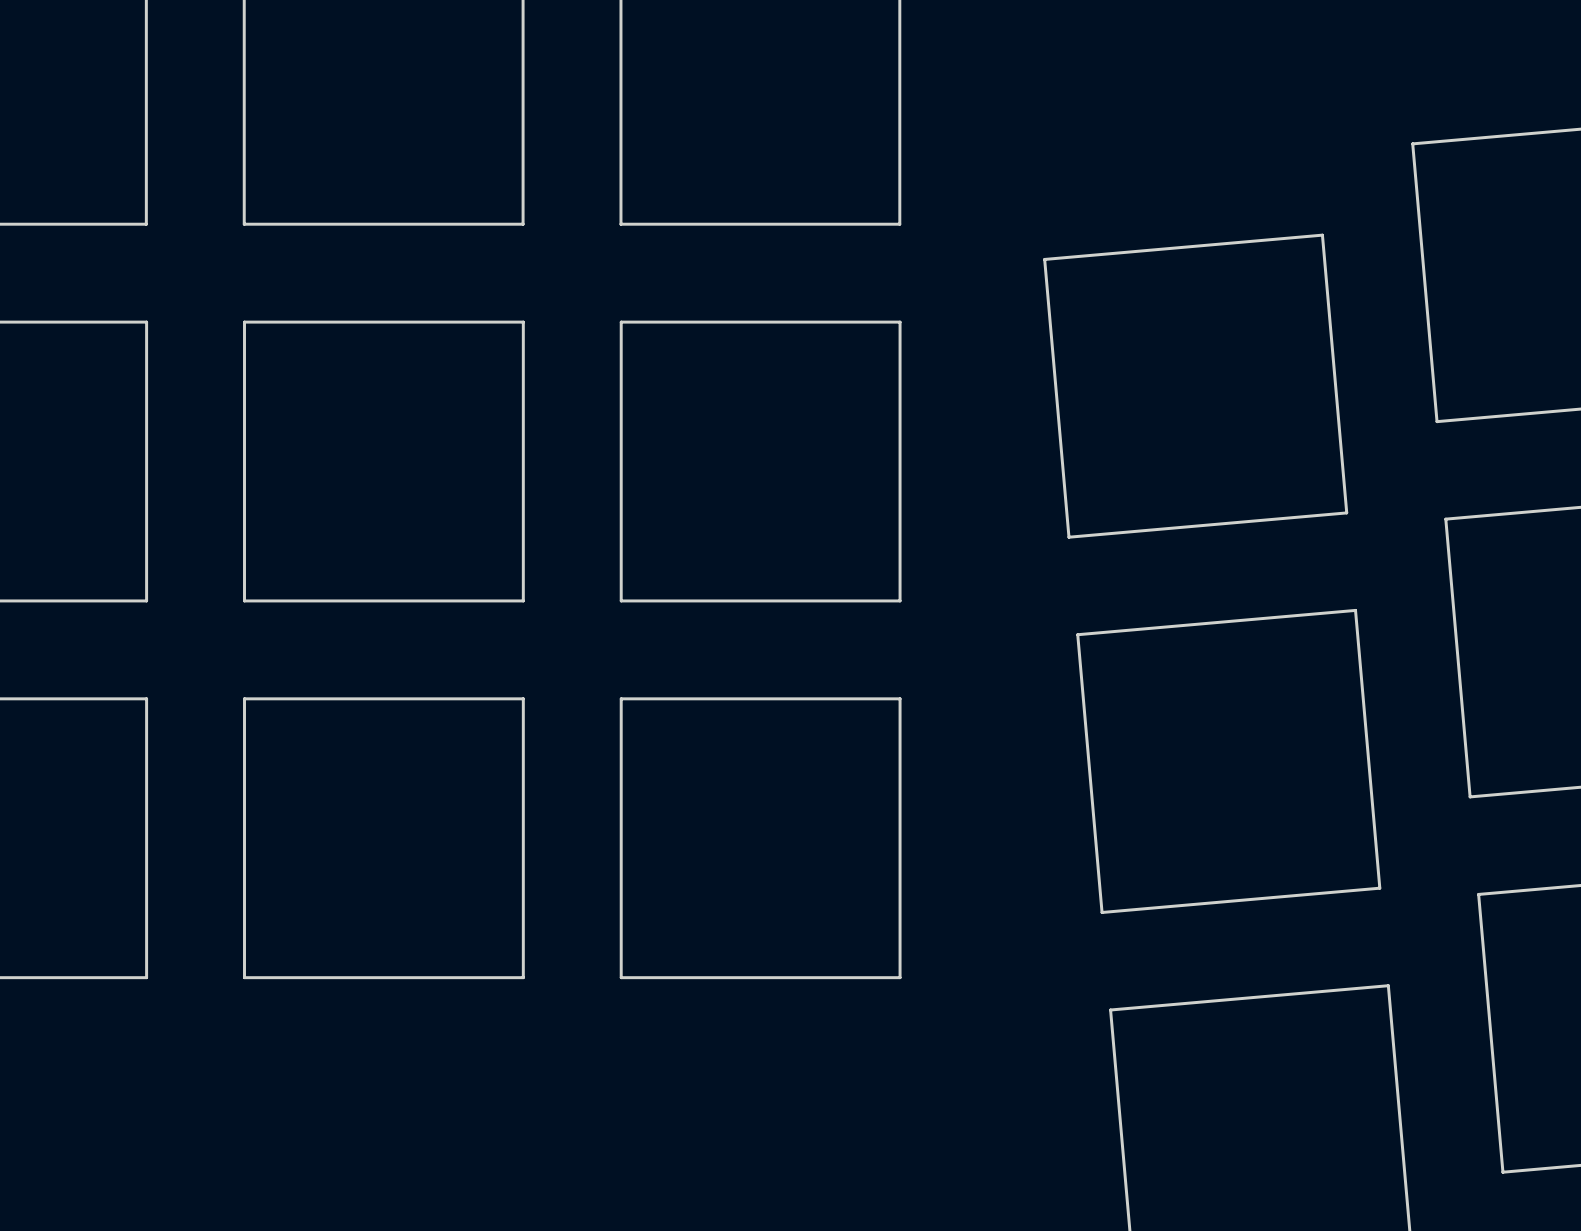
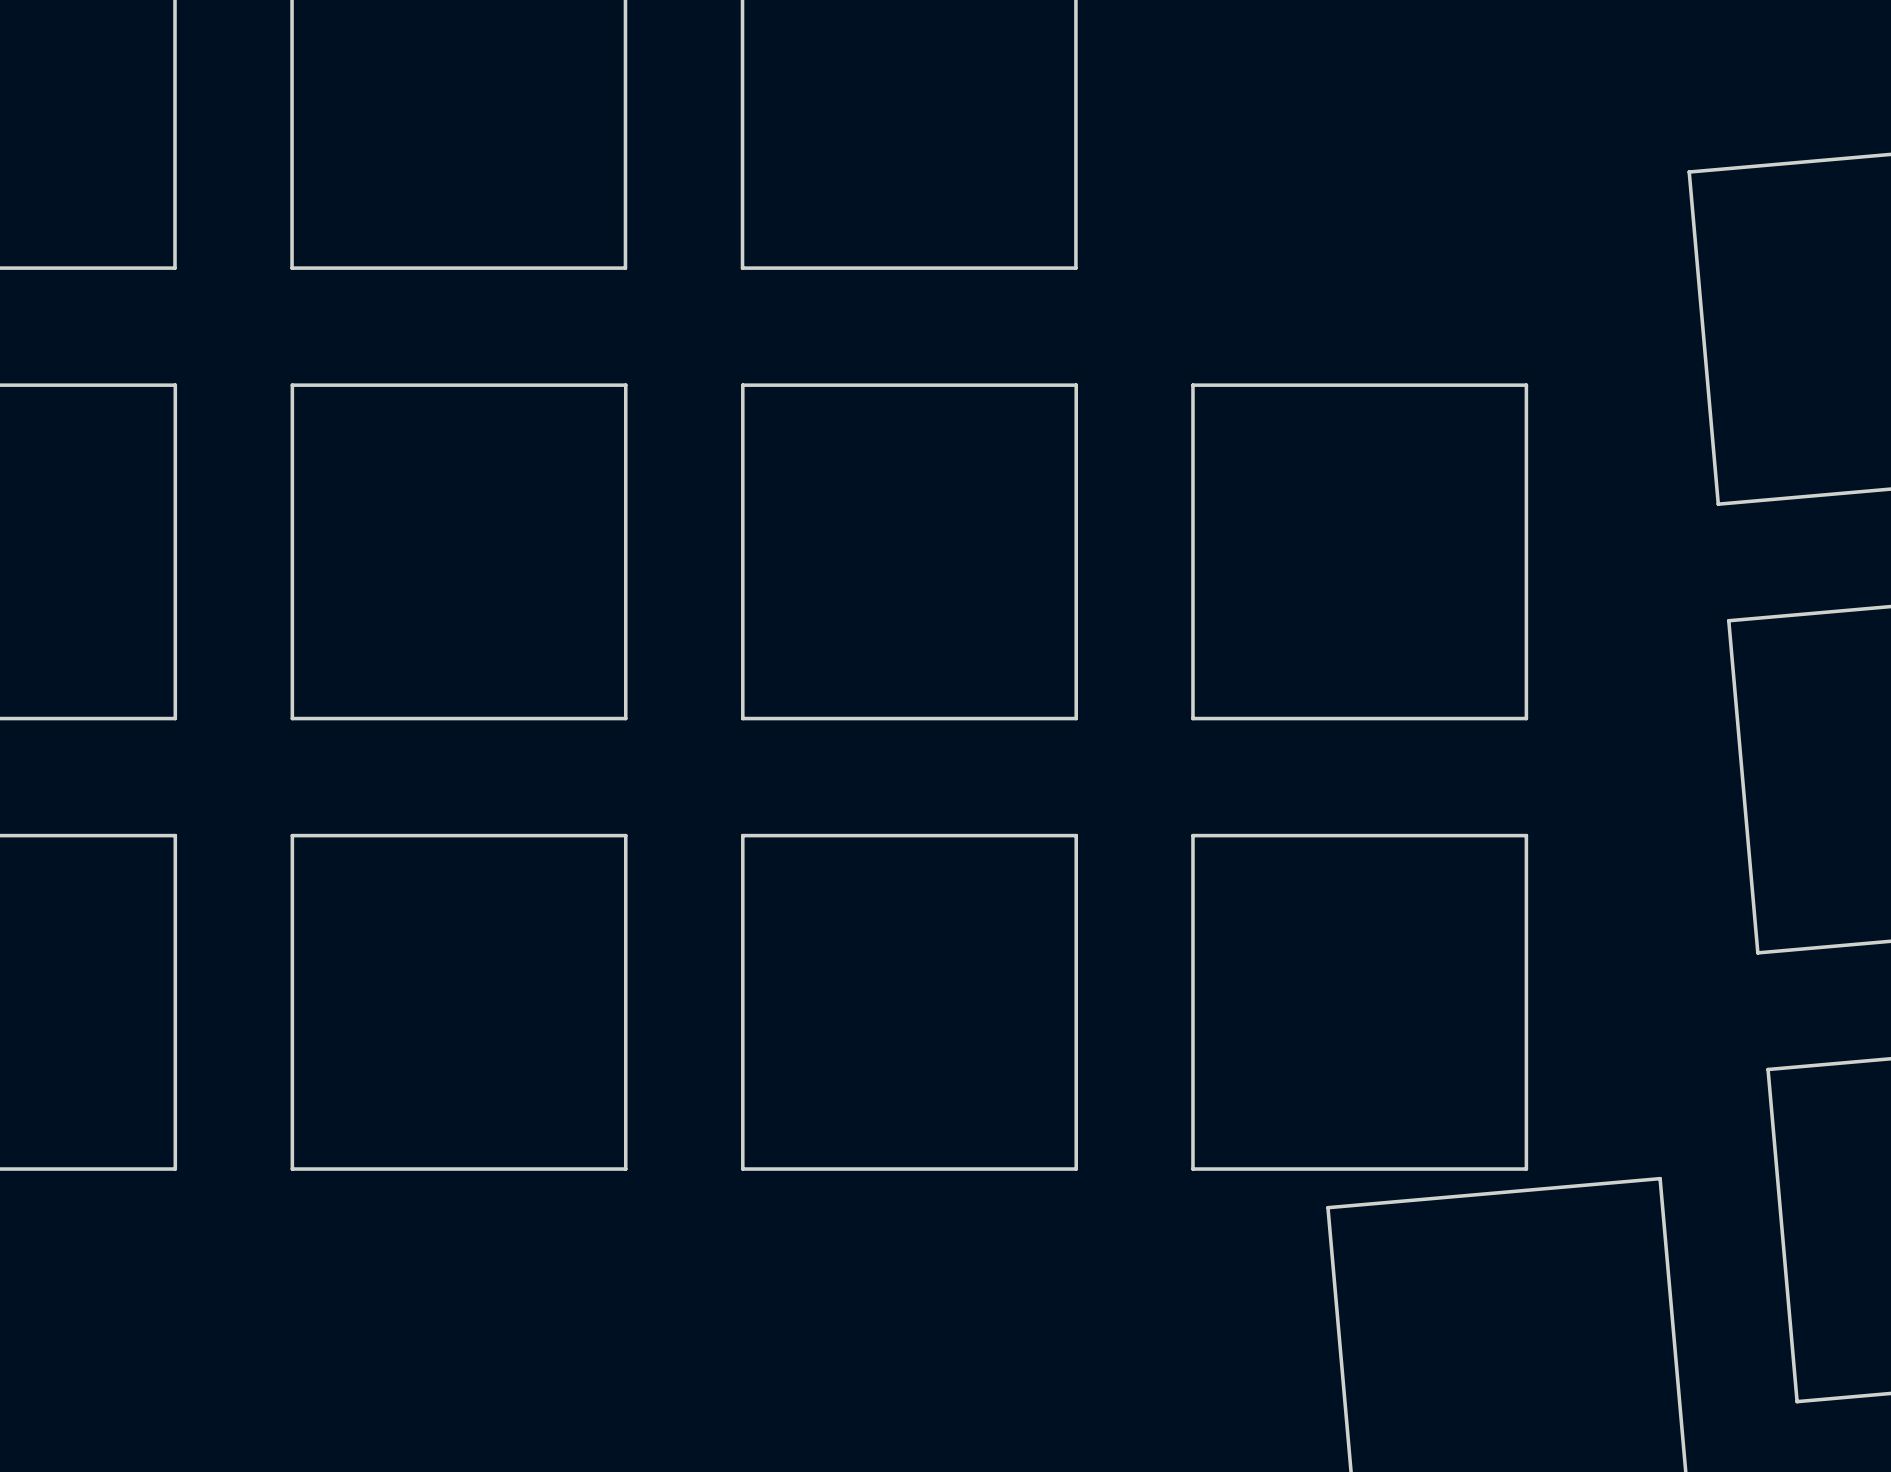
drawing: [1043, 233, 1349, 539] -> none
drawing: none -> [1191, 383, 1529, 721]
drawing: [1076, 608, 1382, 914] -> none
drawing: none -> [1191, 833, 1529, 1171]

